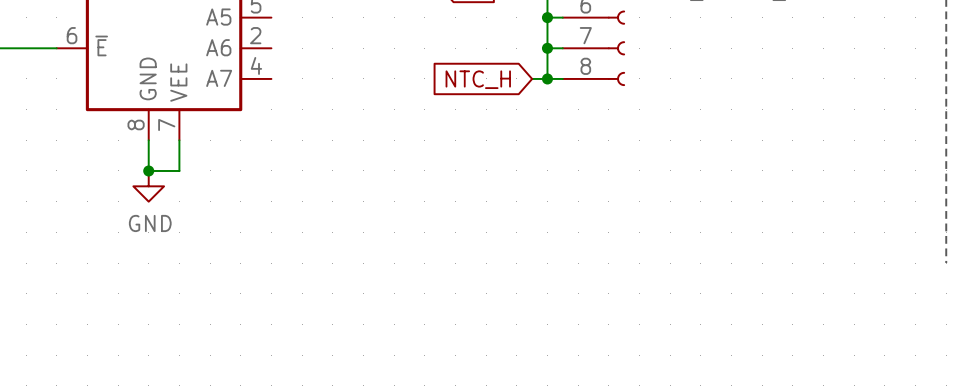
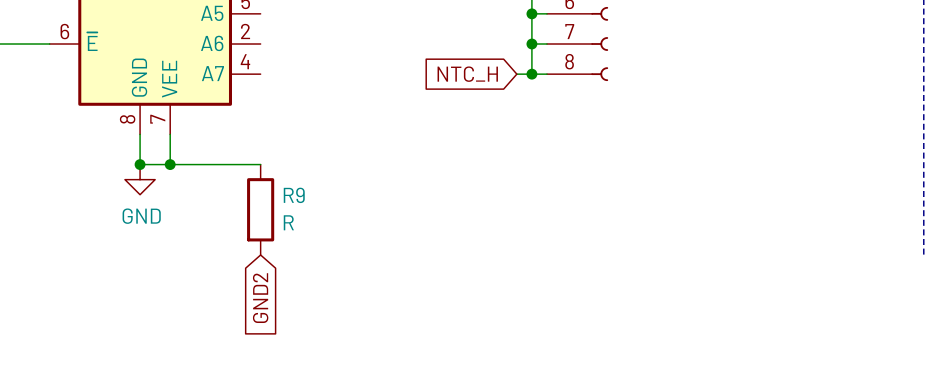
wire: none -> (170, 164) (260, 164)
junction: none -> (170, 164)
R9: none -> R (260, 209)
global label: none -> GND2 (260, 298)

